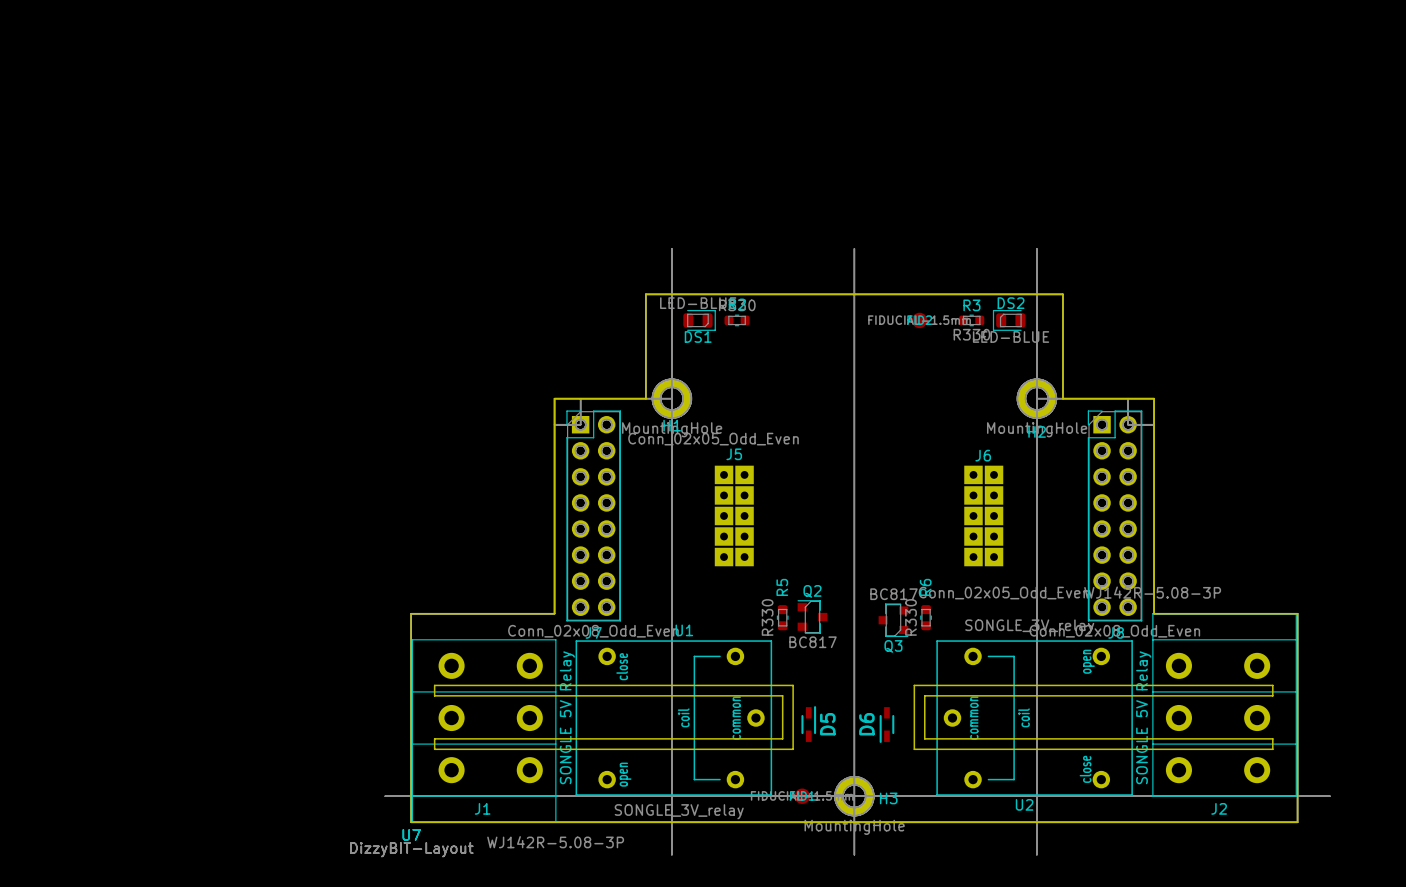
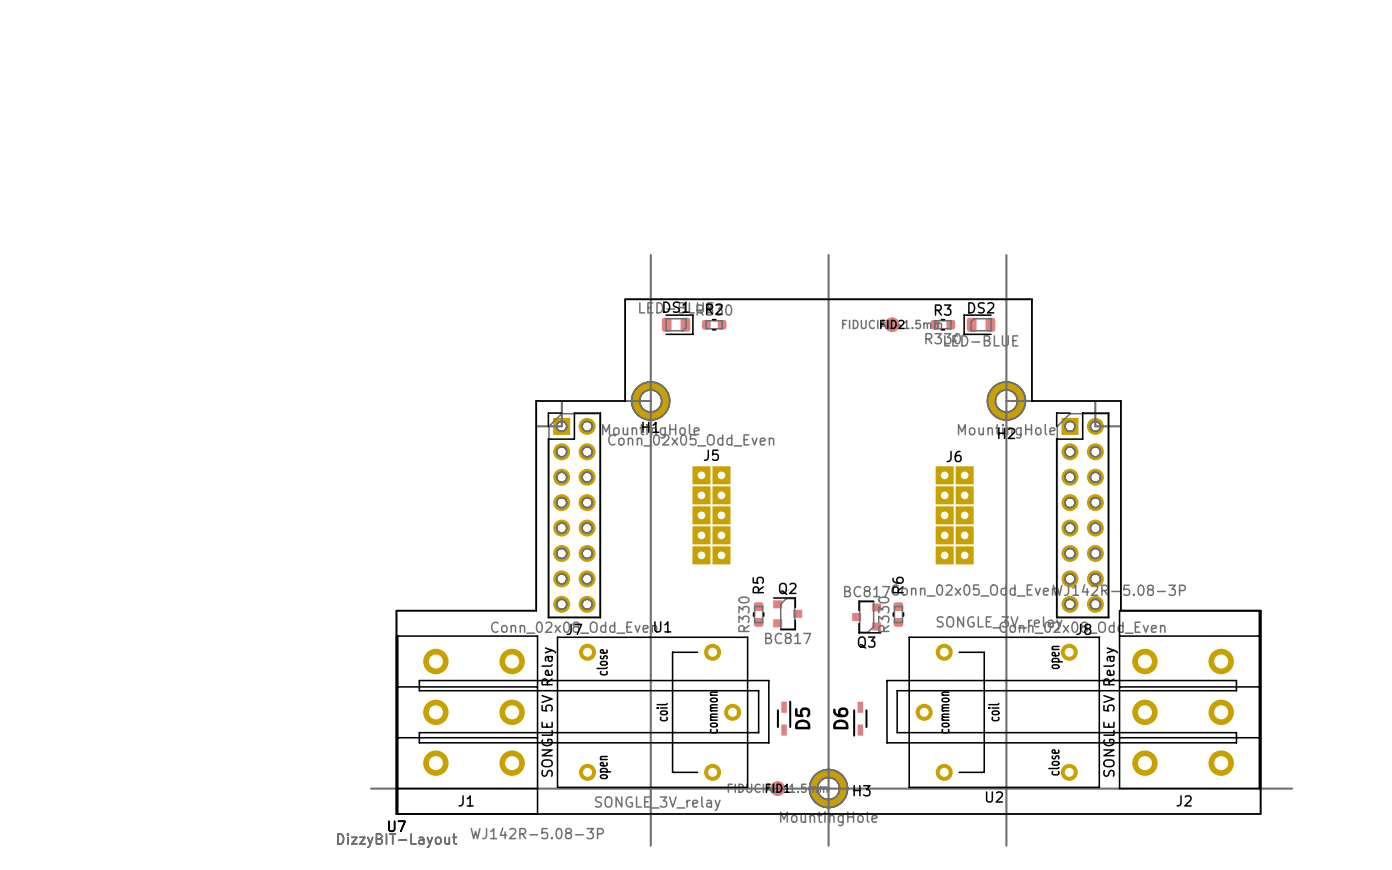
DS1 name position: DS1 (698, 336) -> DS1 (676, 307)

